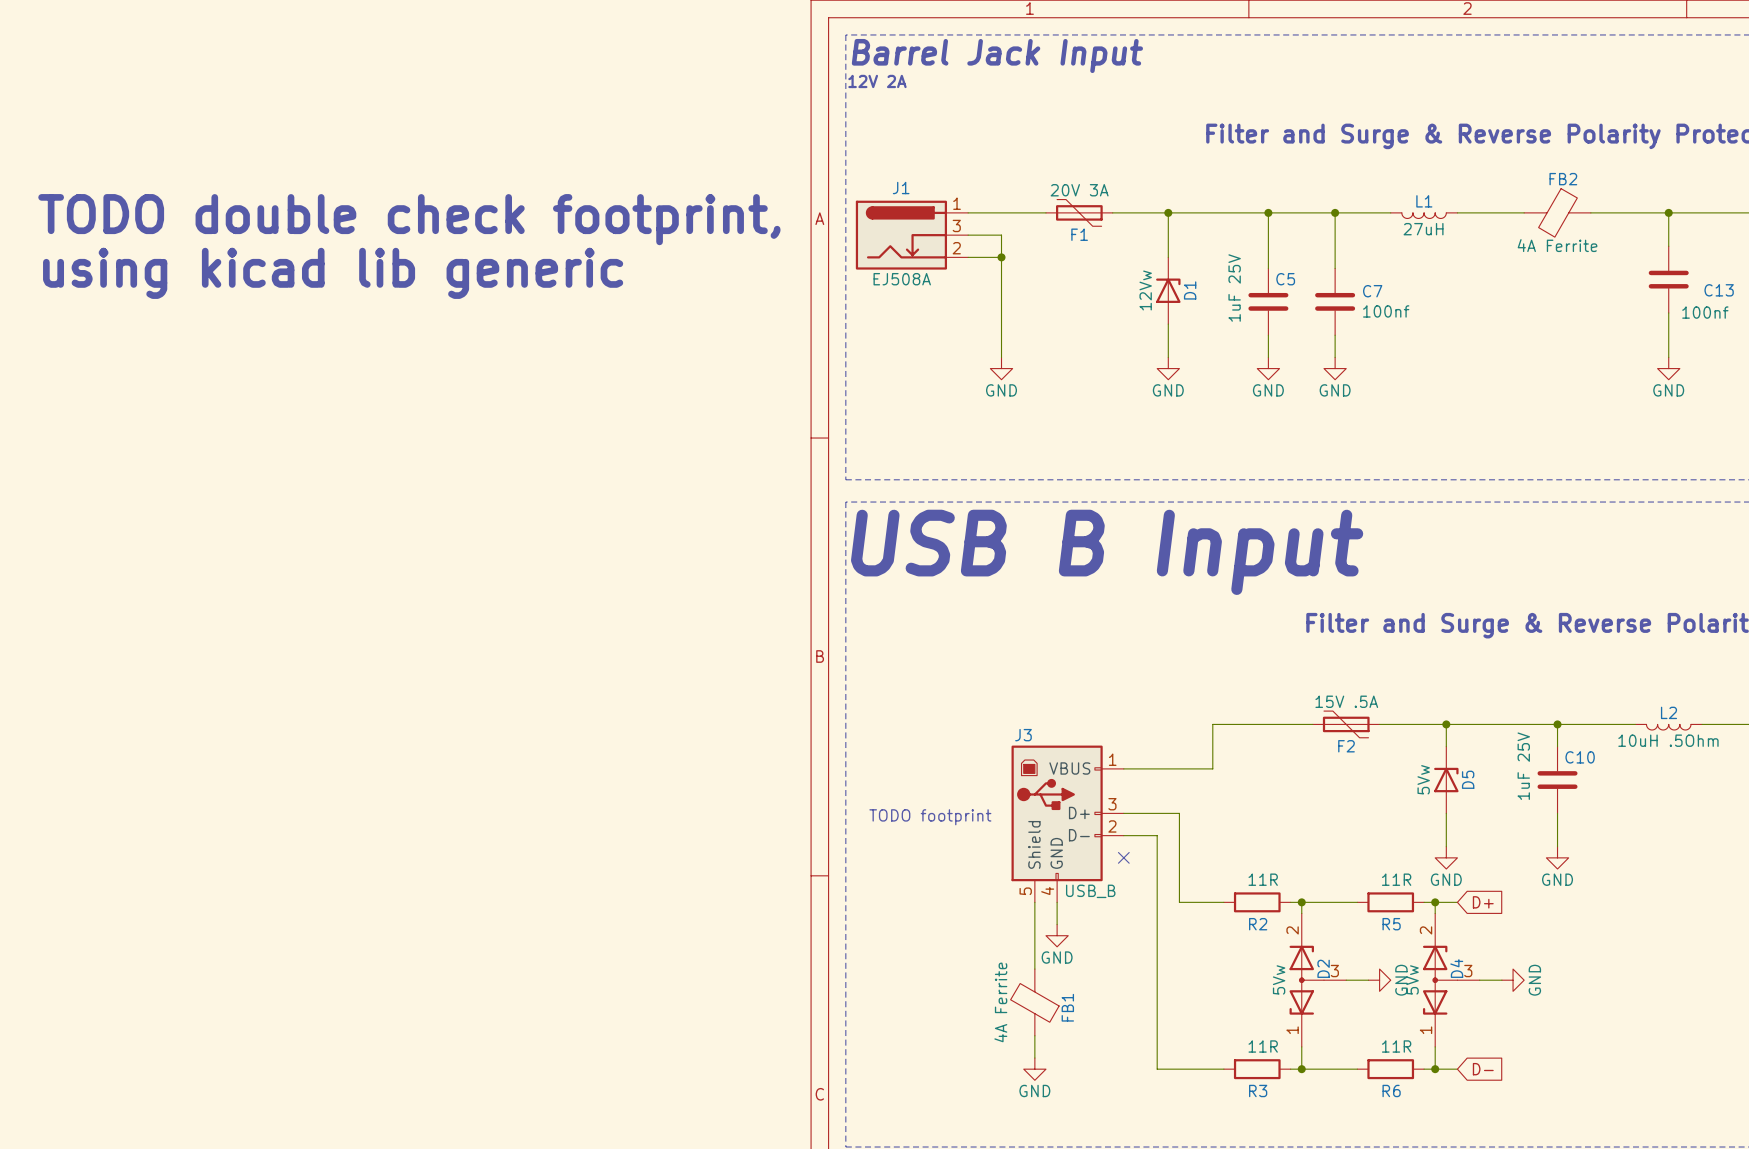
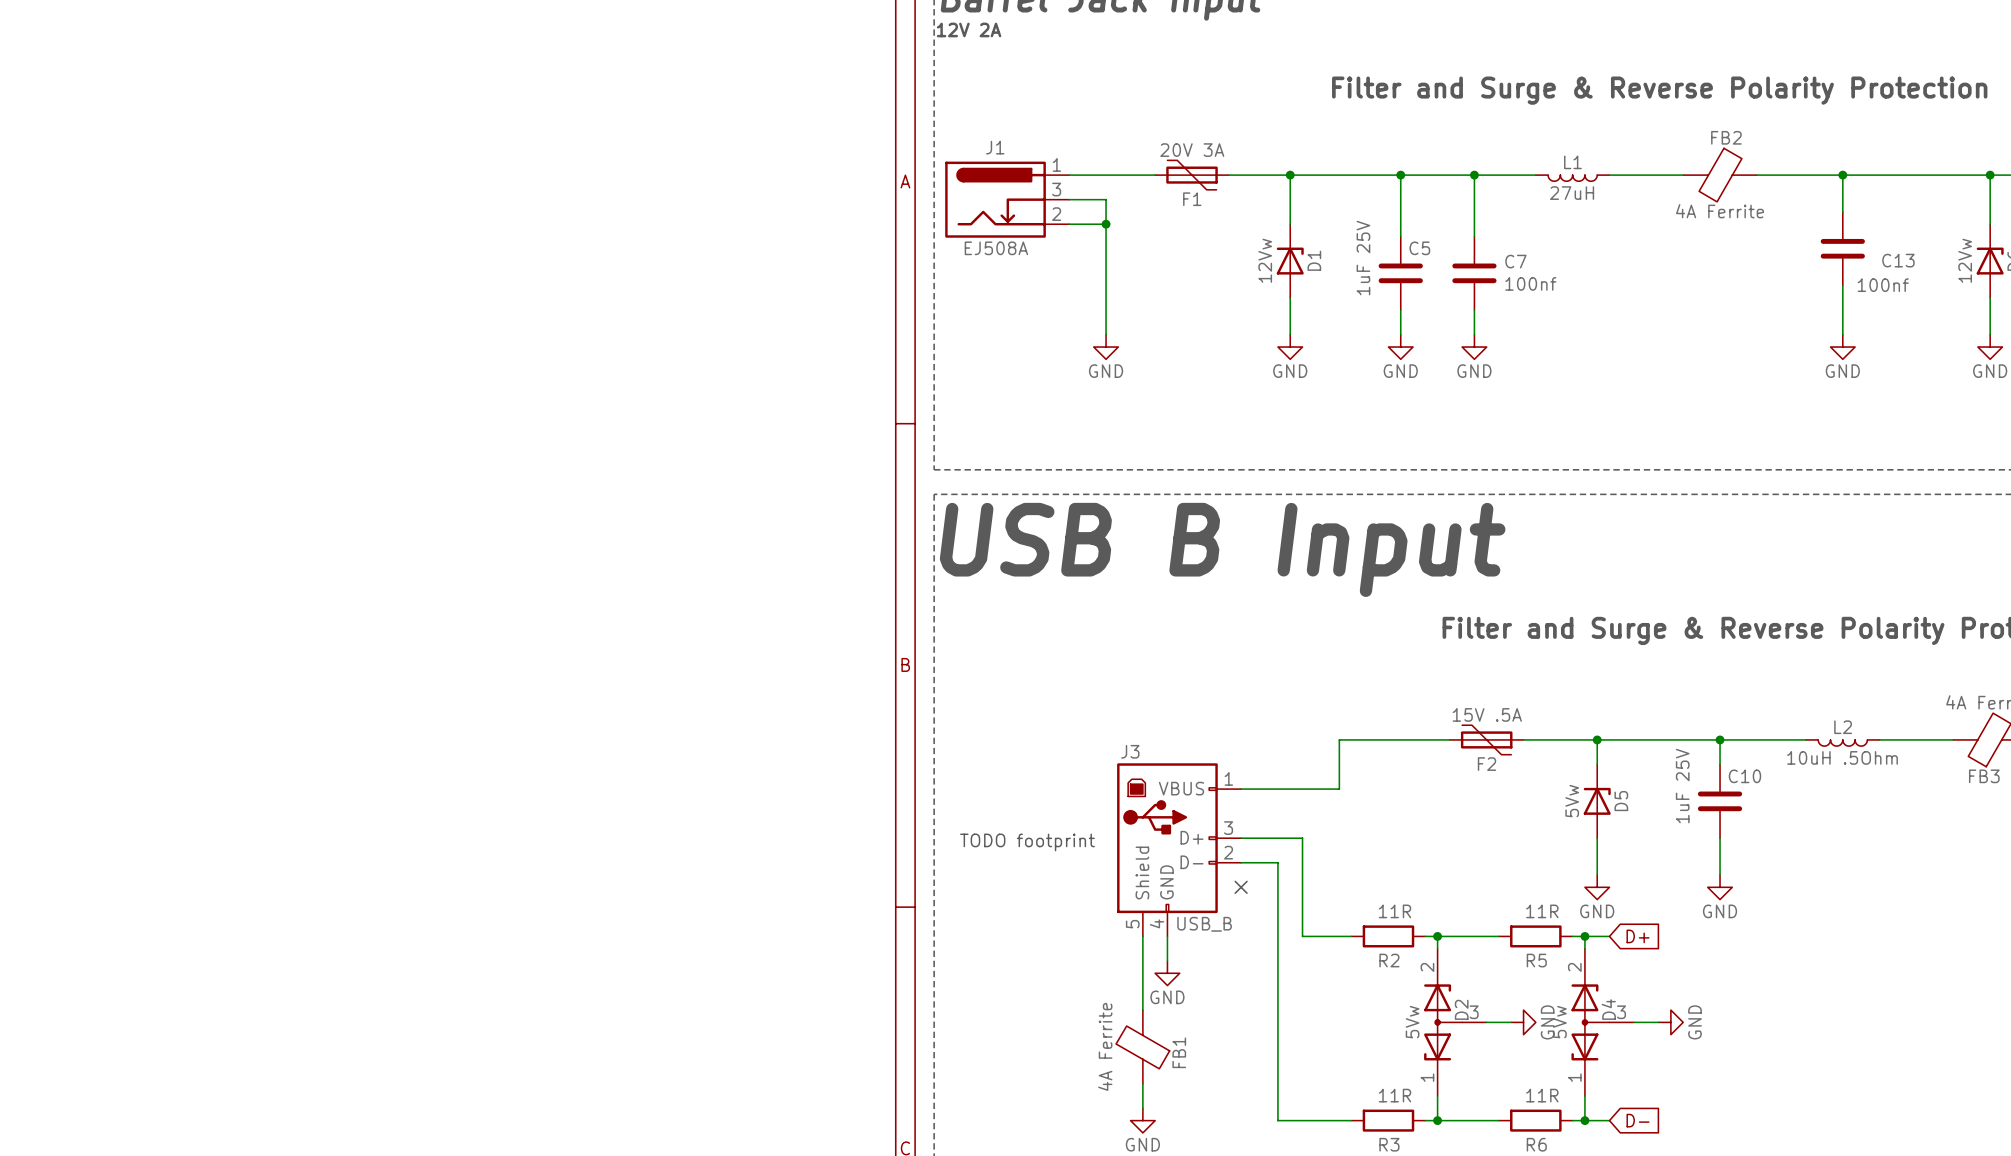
text: TODO double check footprint, (409, 219) -> none
text: using kicad lib generic (333, 273) -> none

